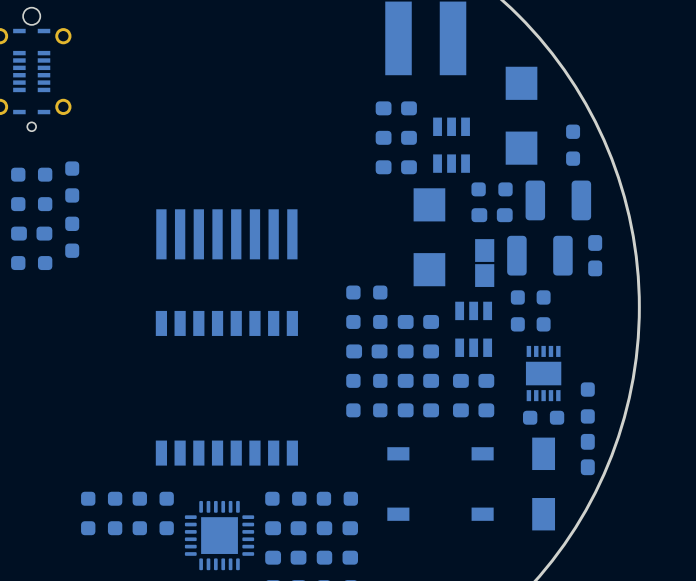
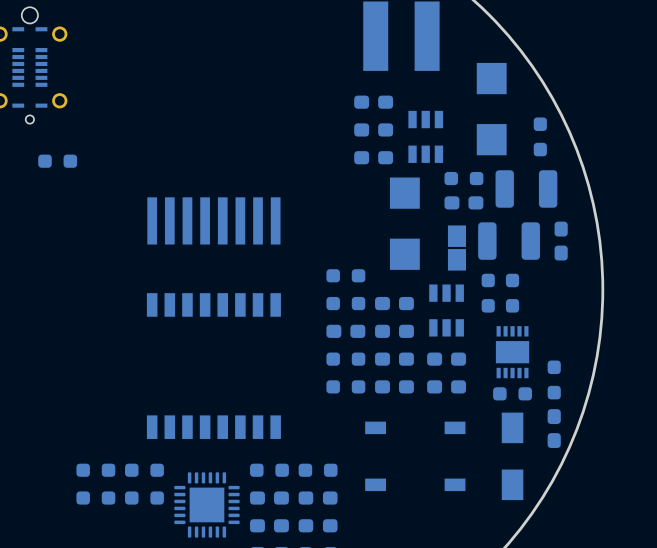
part: none -> (57, 161)
part: (31, 174) -> none
part: (72, 182) -> none
part: (31, 204) -> none
part: (31, 233) -> none
part: (72, 237) -> none
part: (31, 263) -> none

